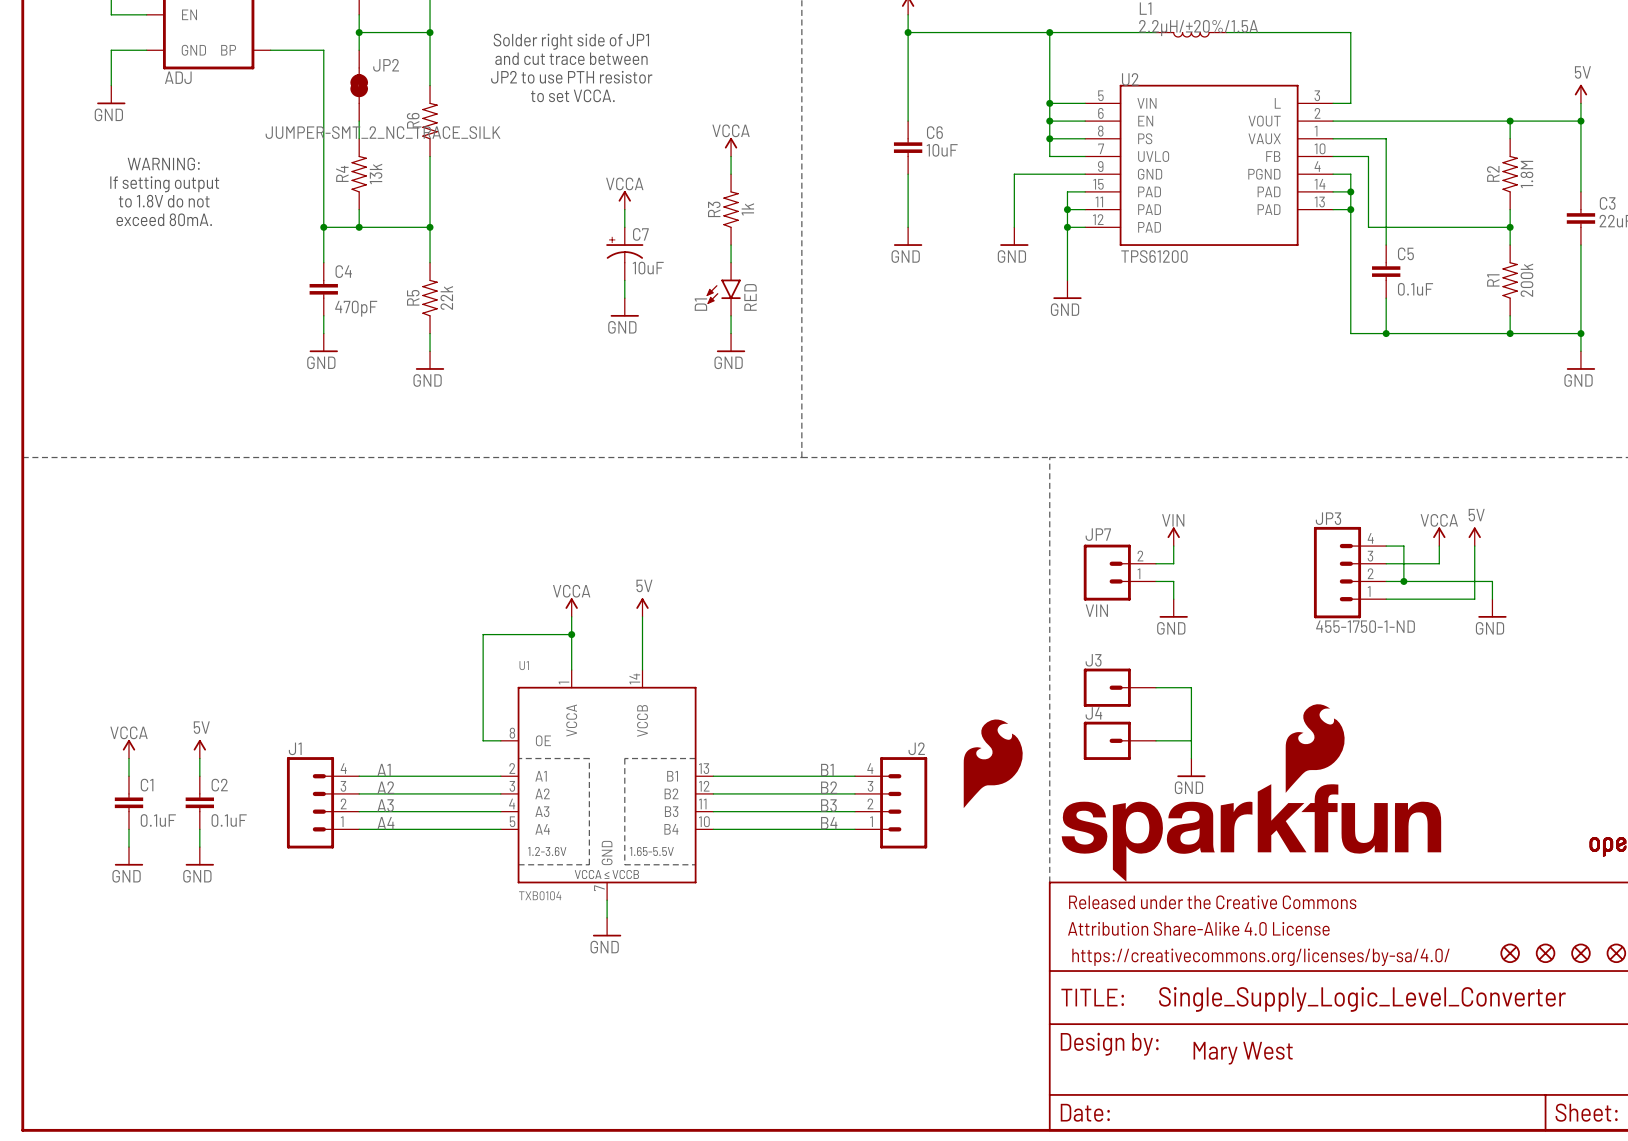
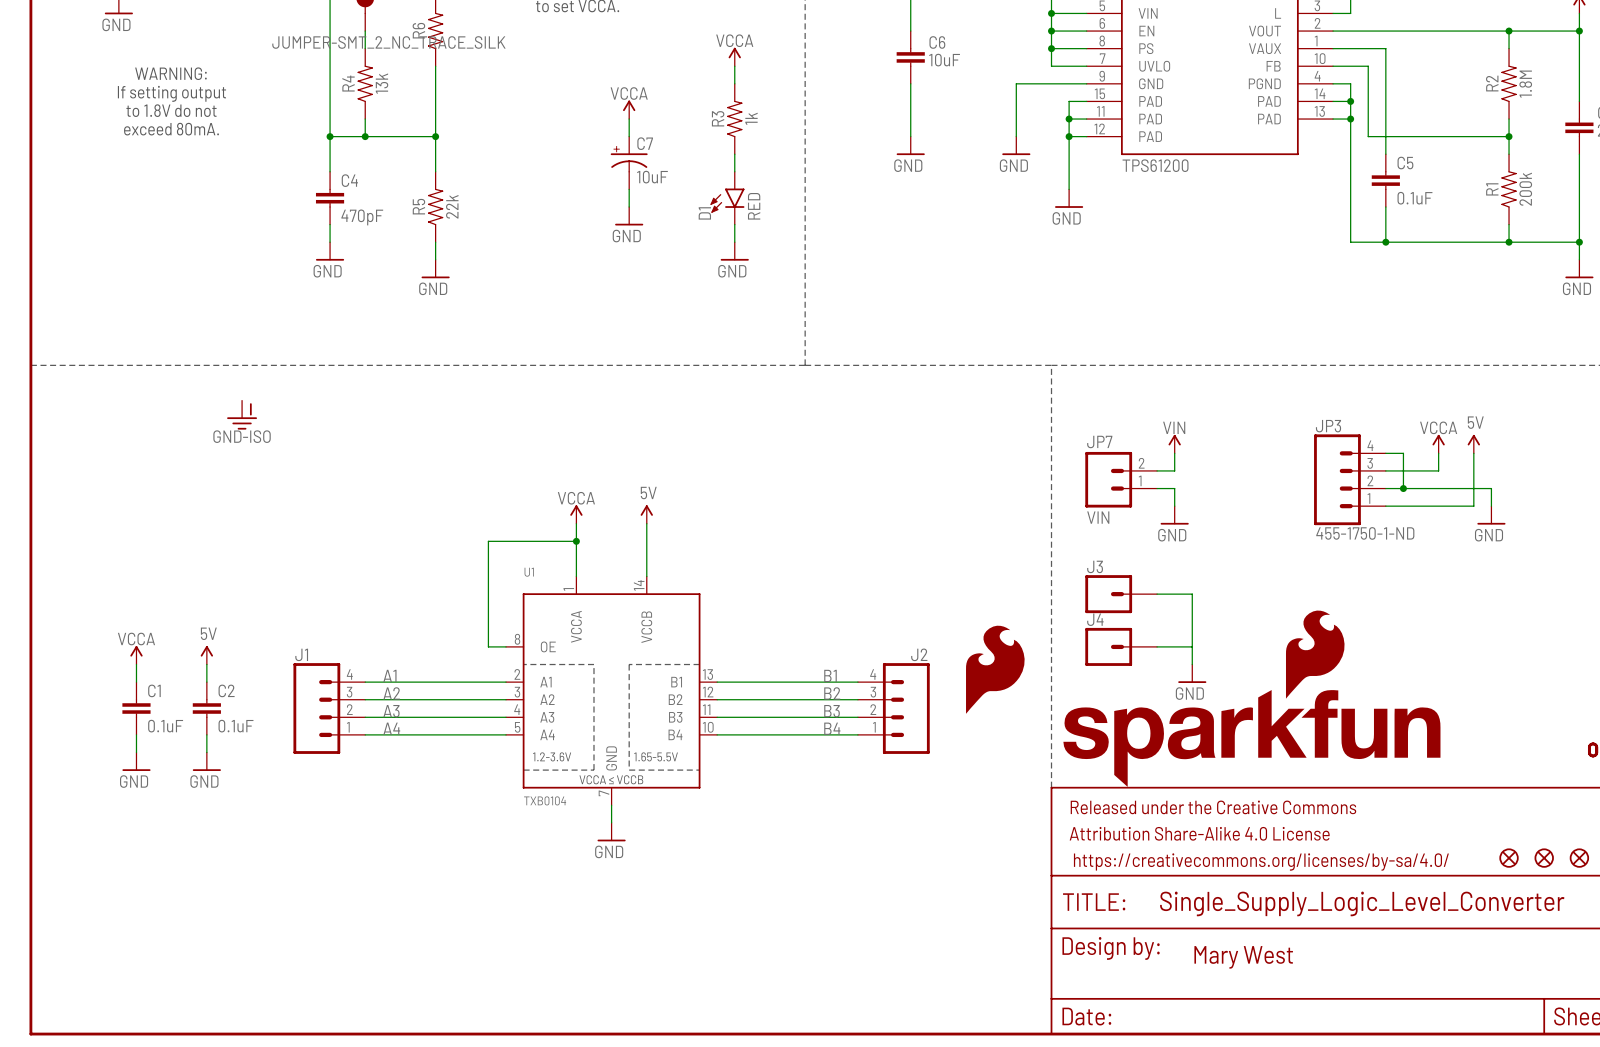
power symbol: none -> GND-ISO (242, 415)

